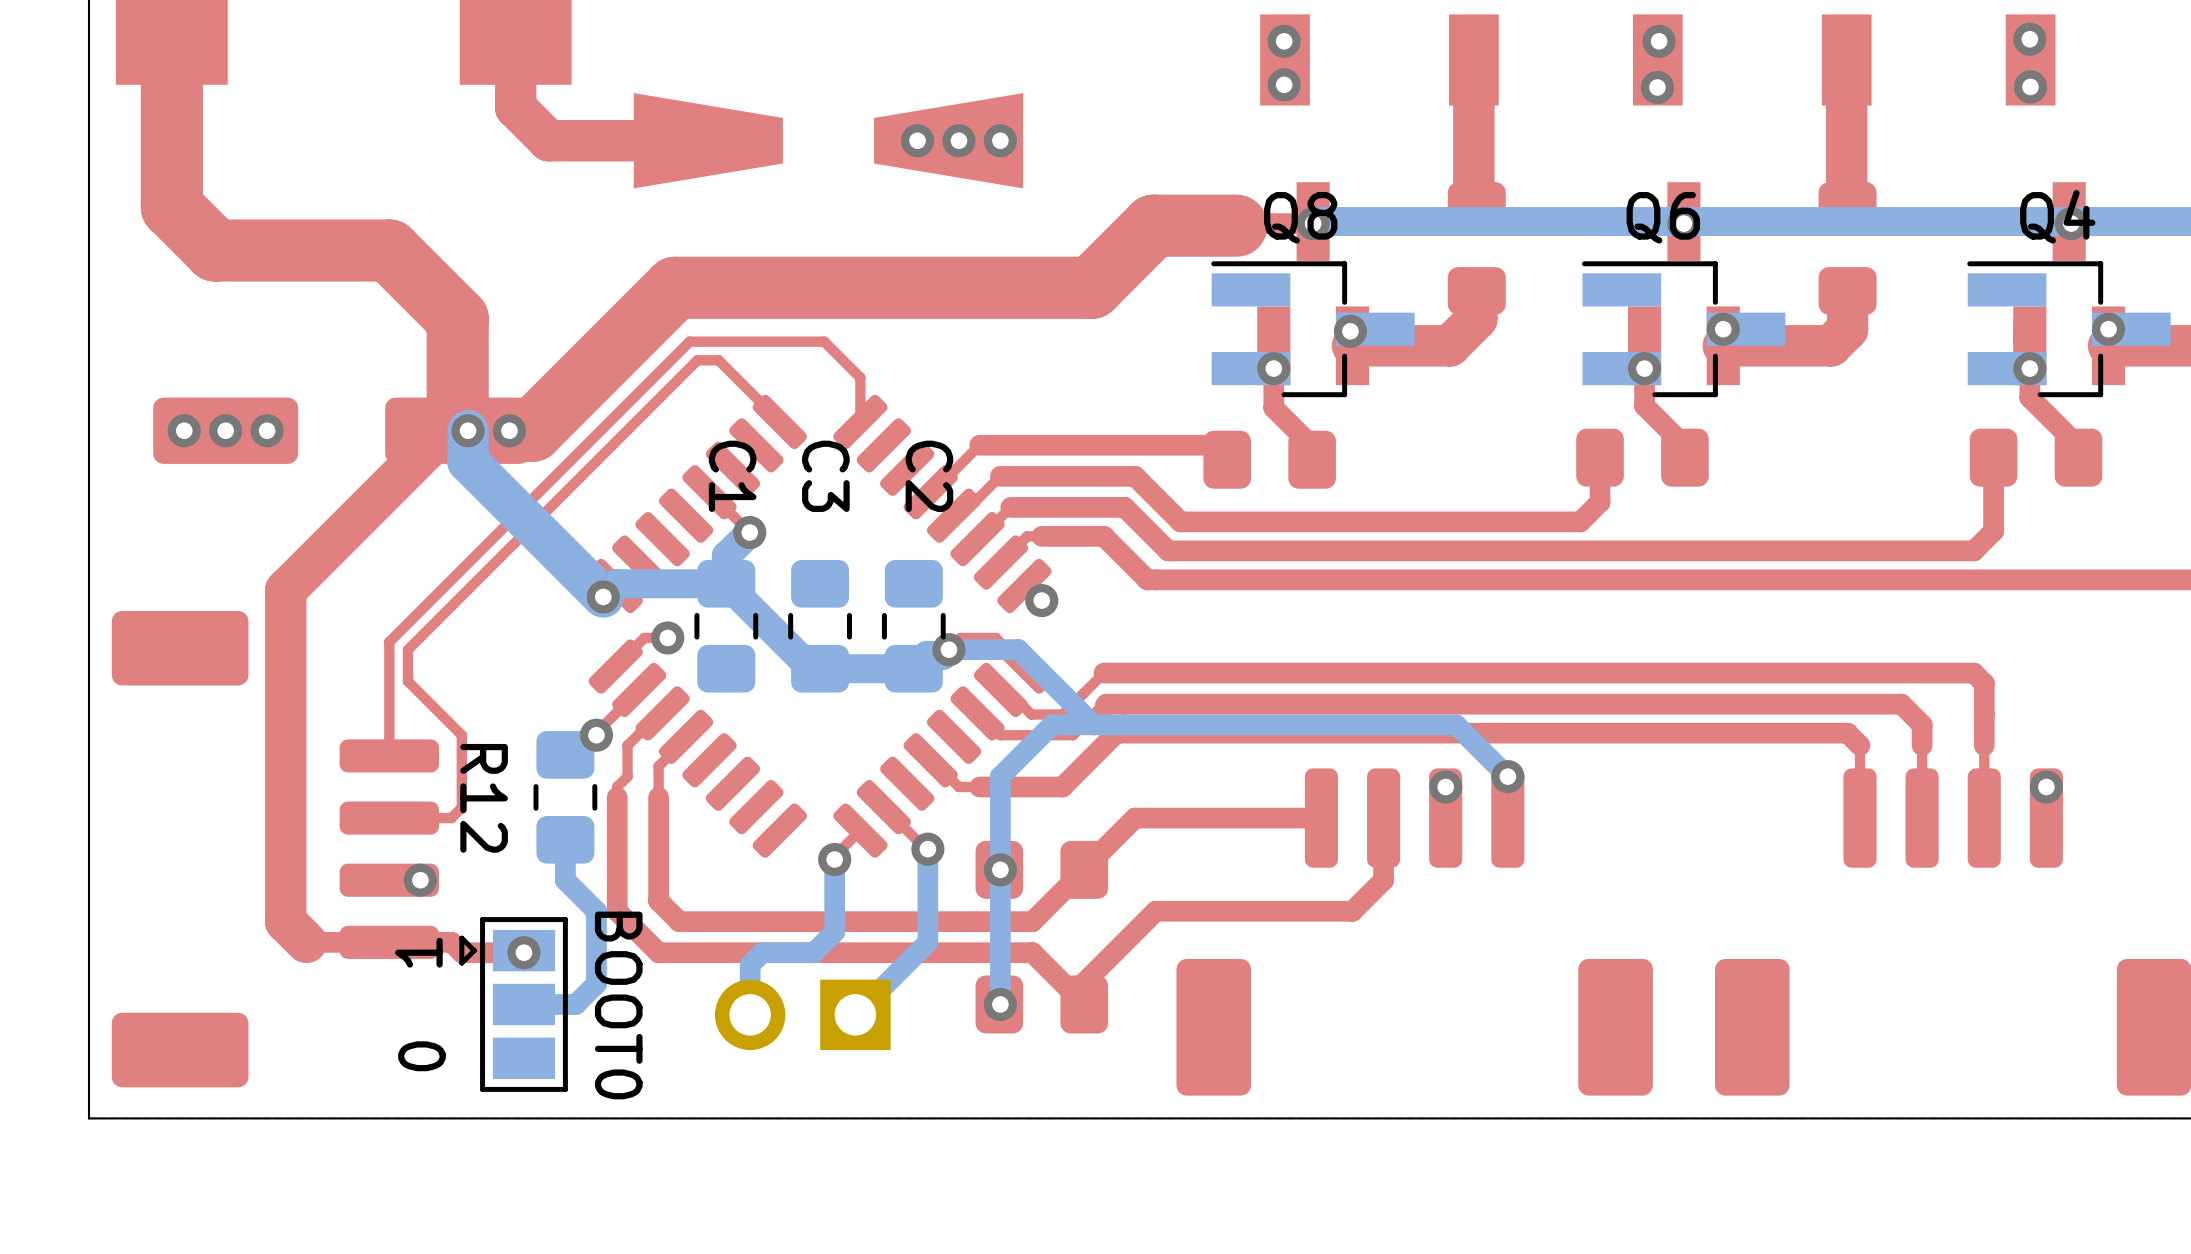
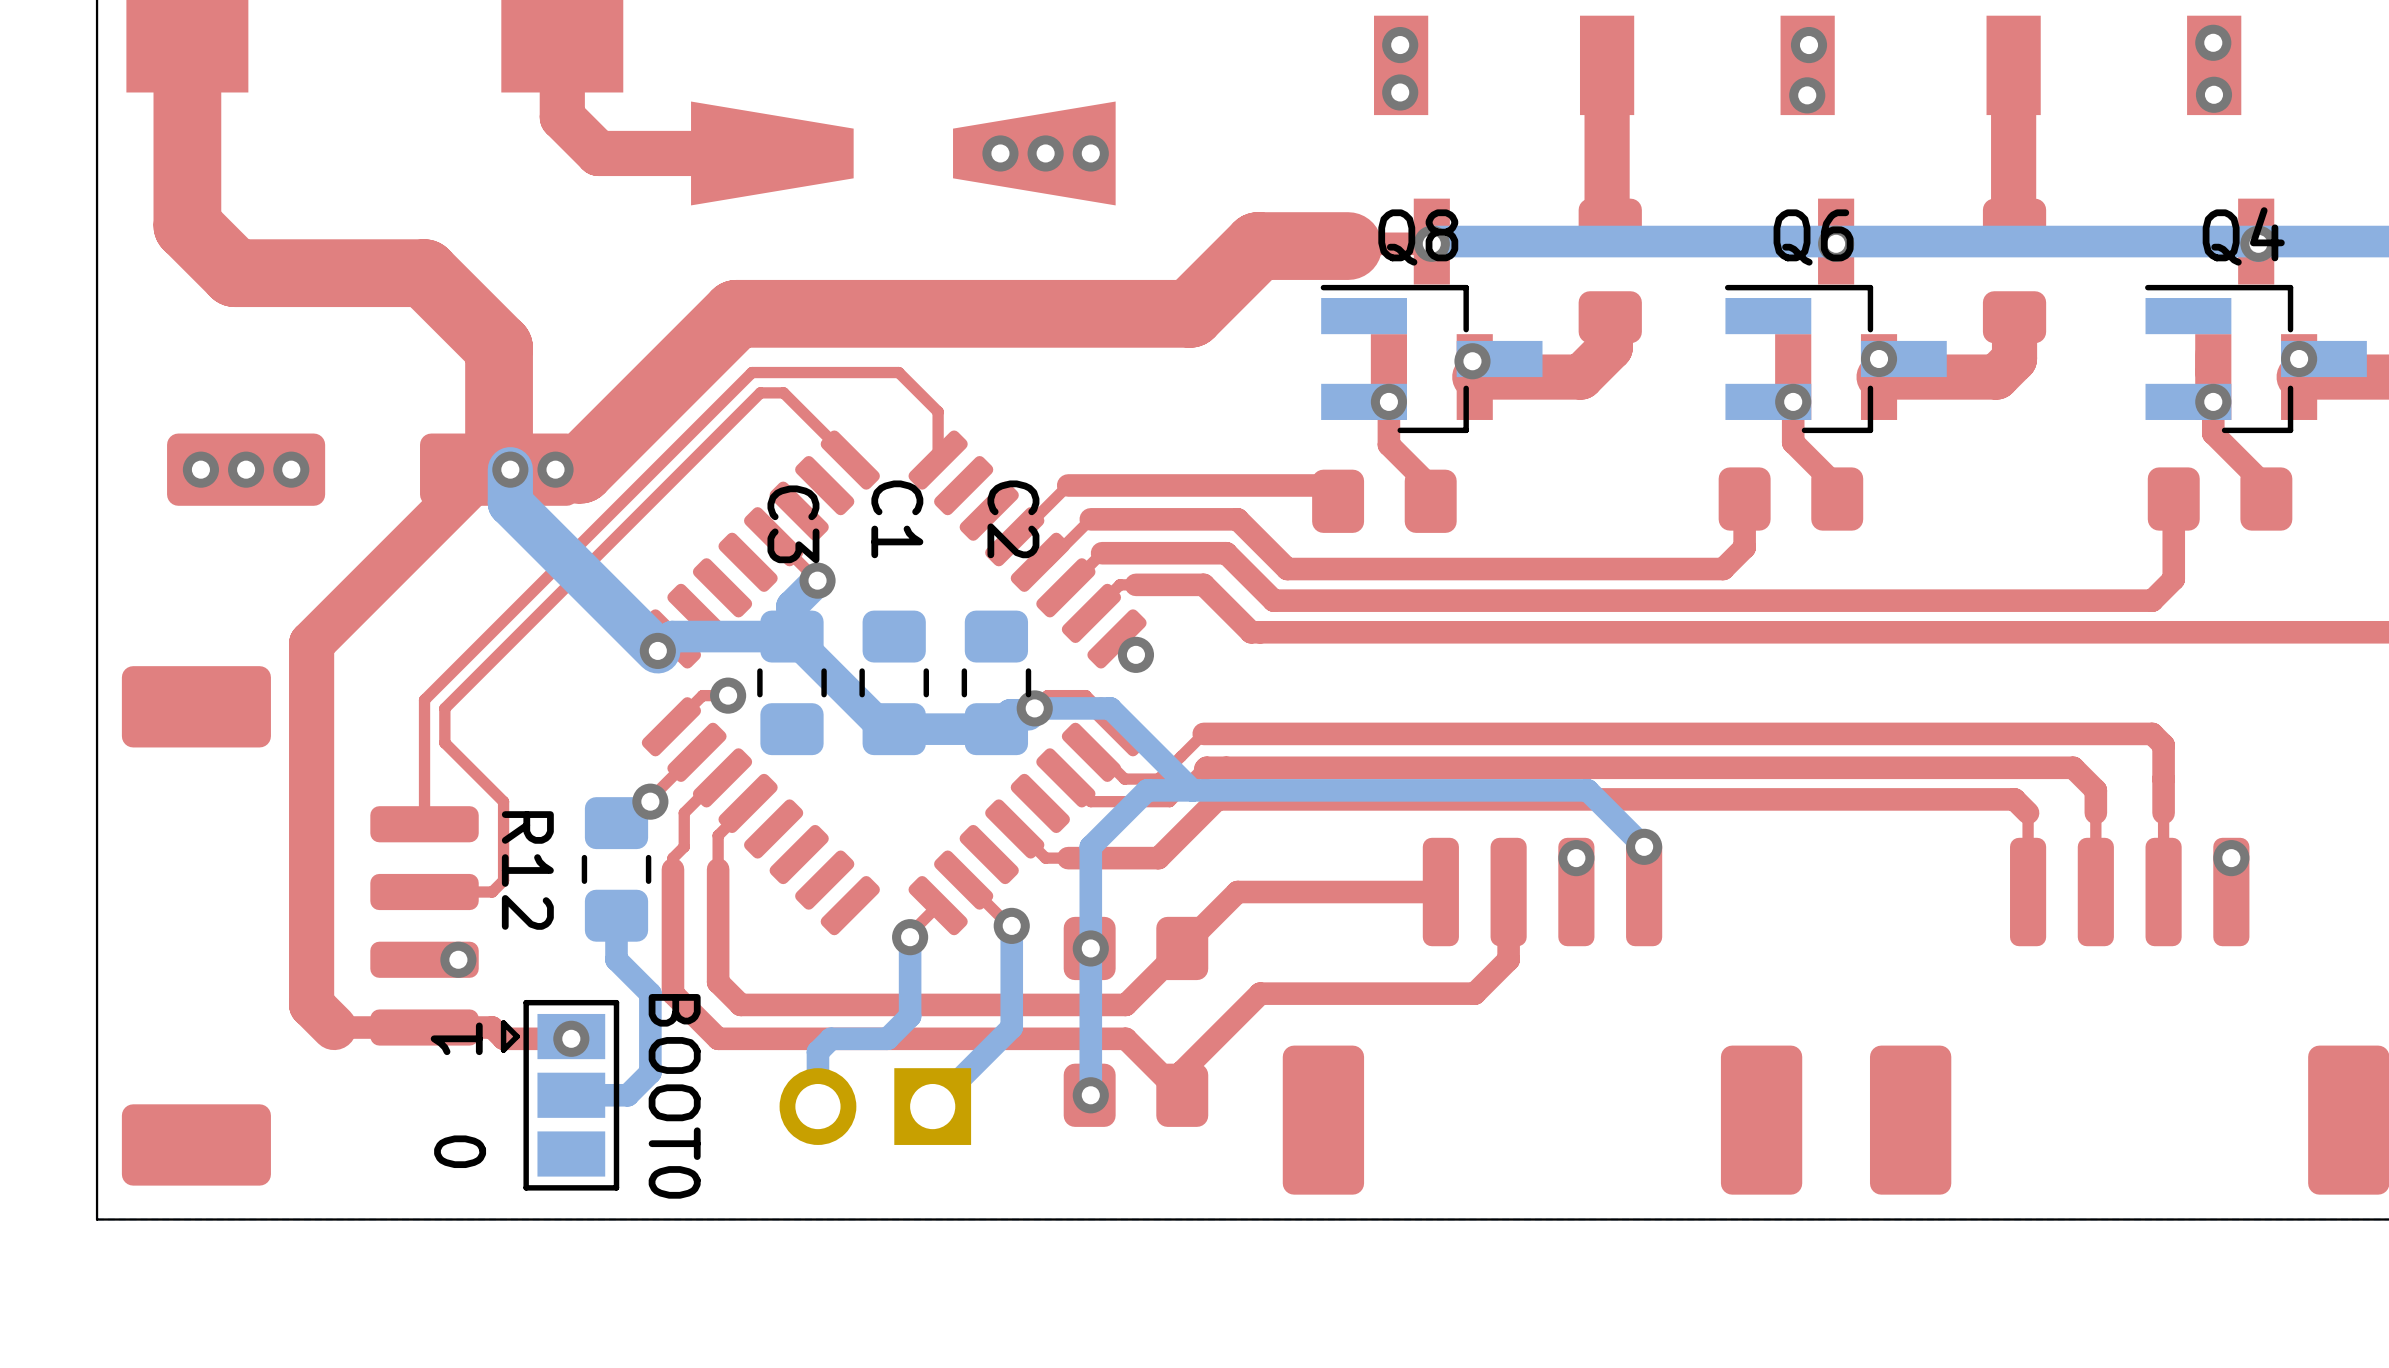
C1 name position: C1 (732, 476) -> C1 (897, 519)
C3 name position: C3 (825, 476) -> C3 (793, 524)

